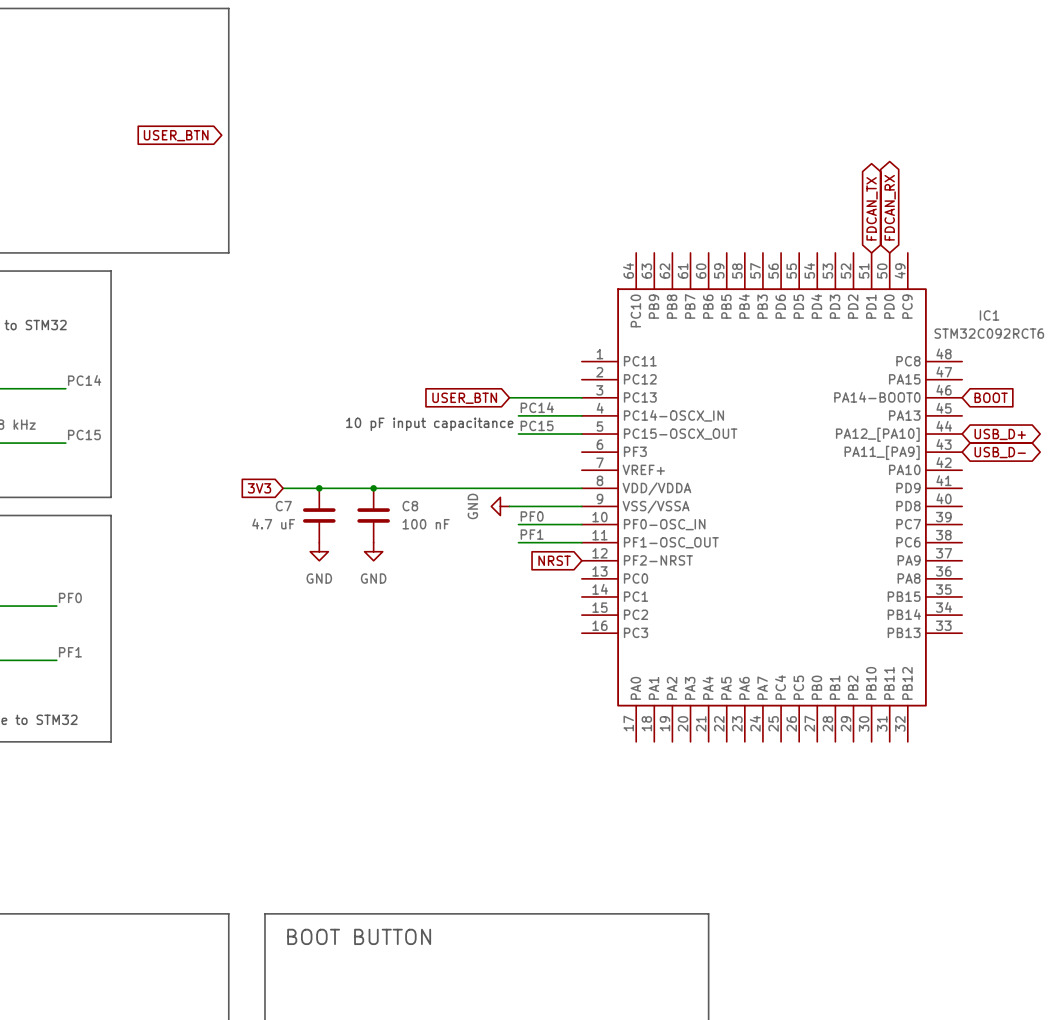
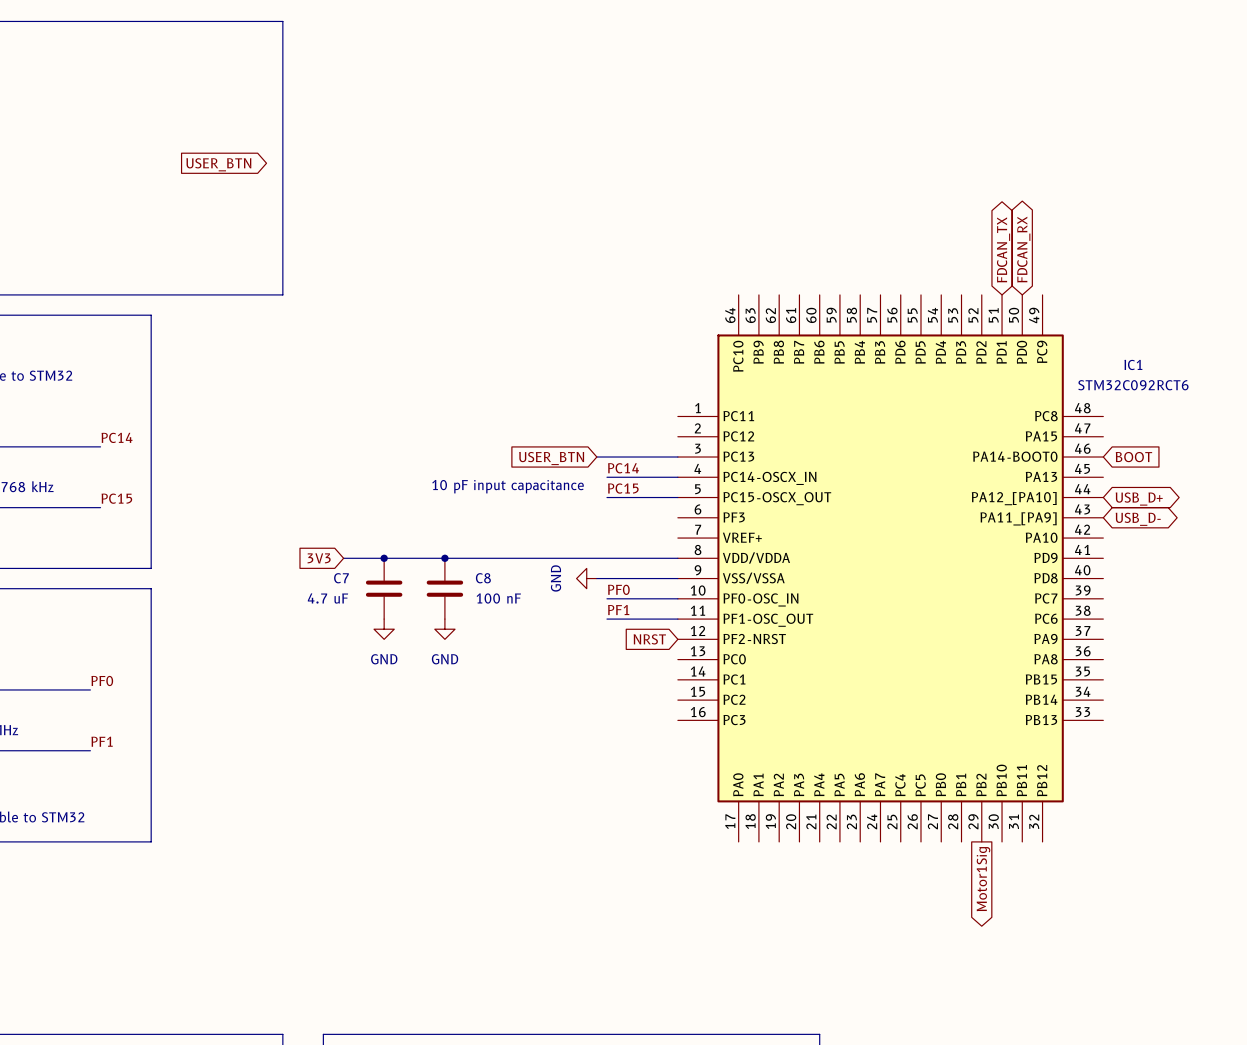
global label: none -> Motor1Sig (983, 879)

